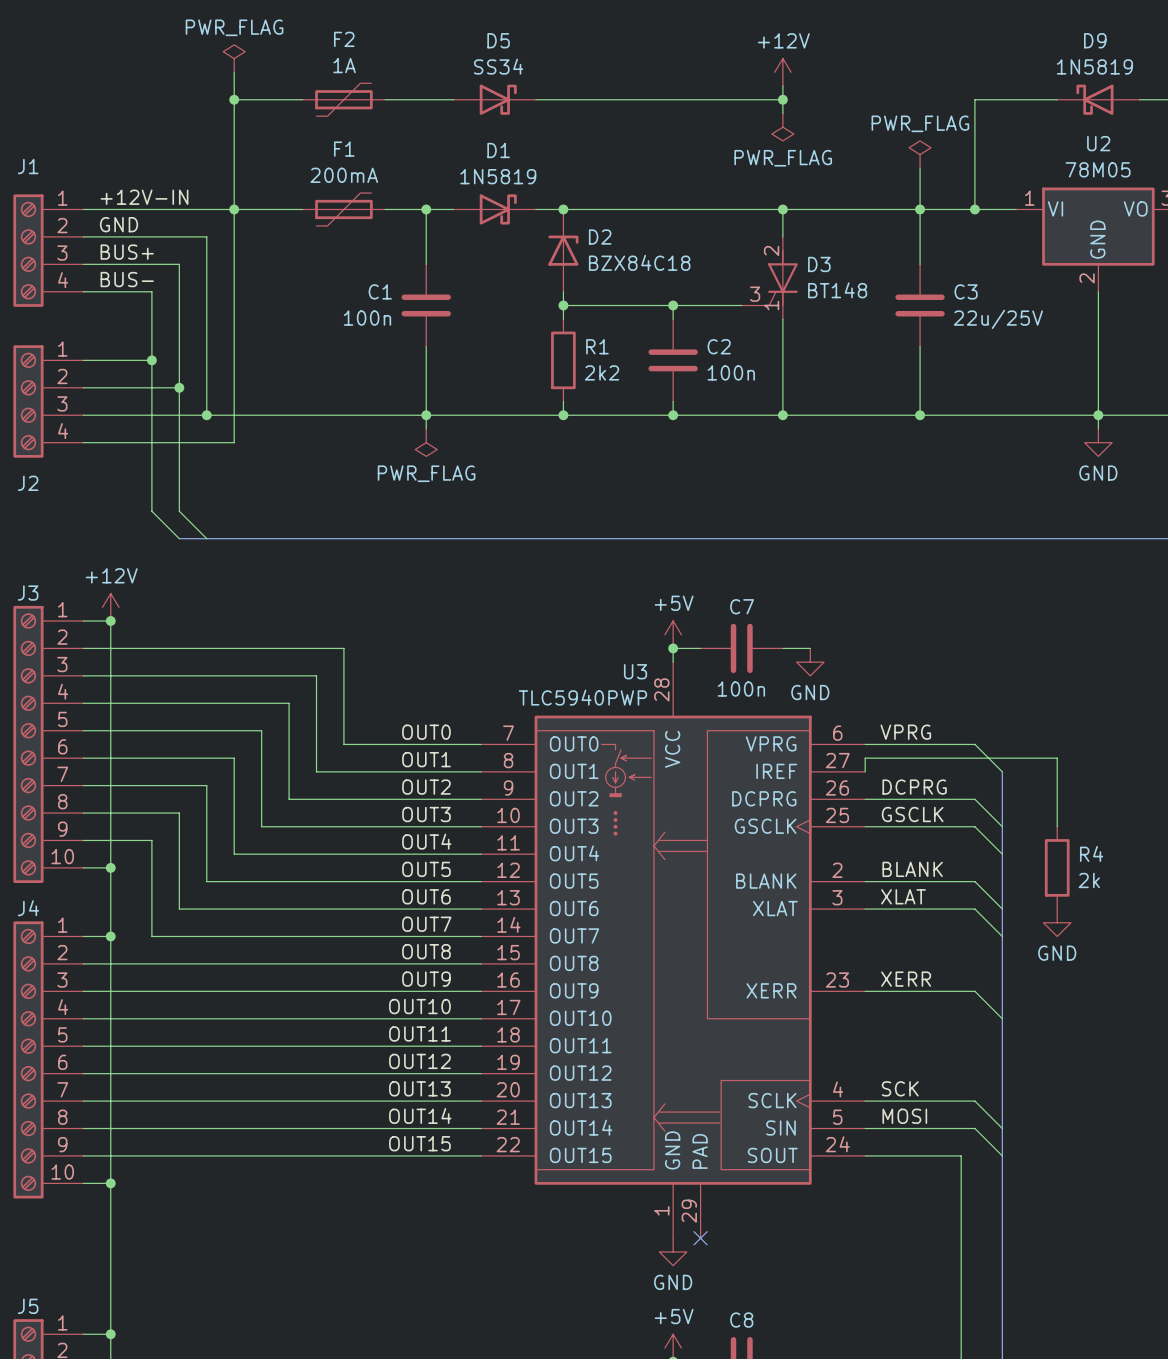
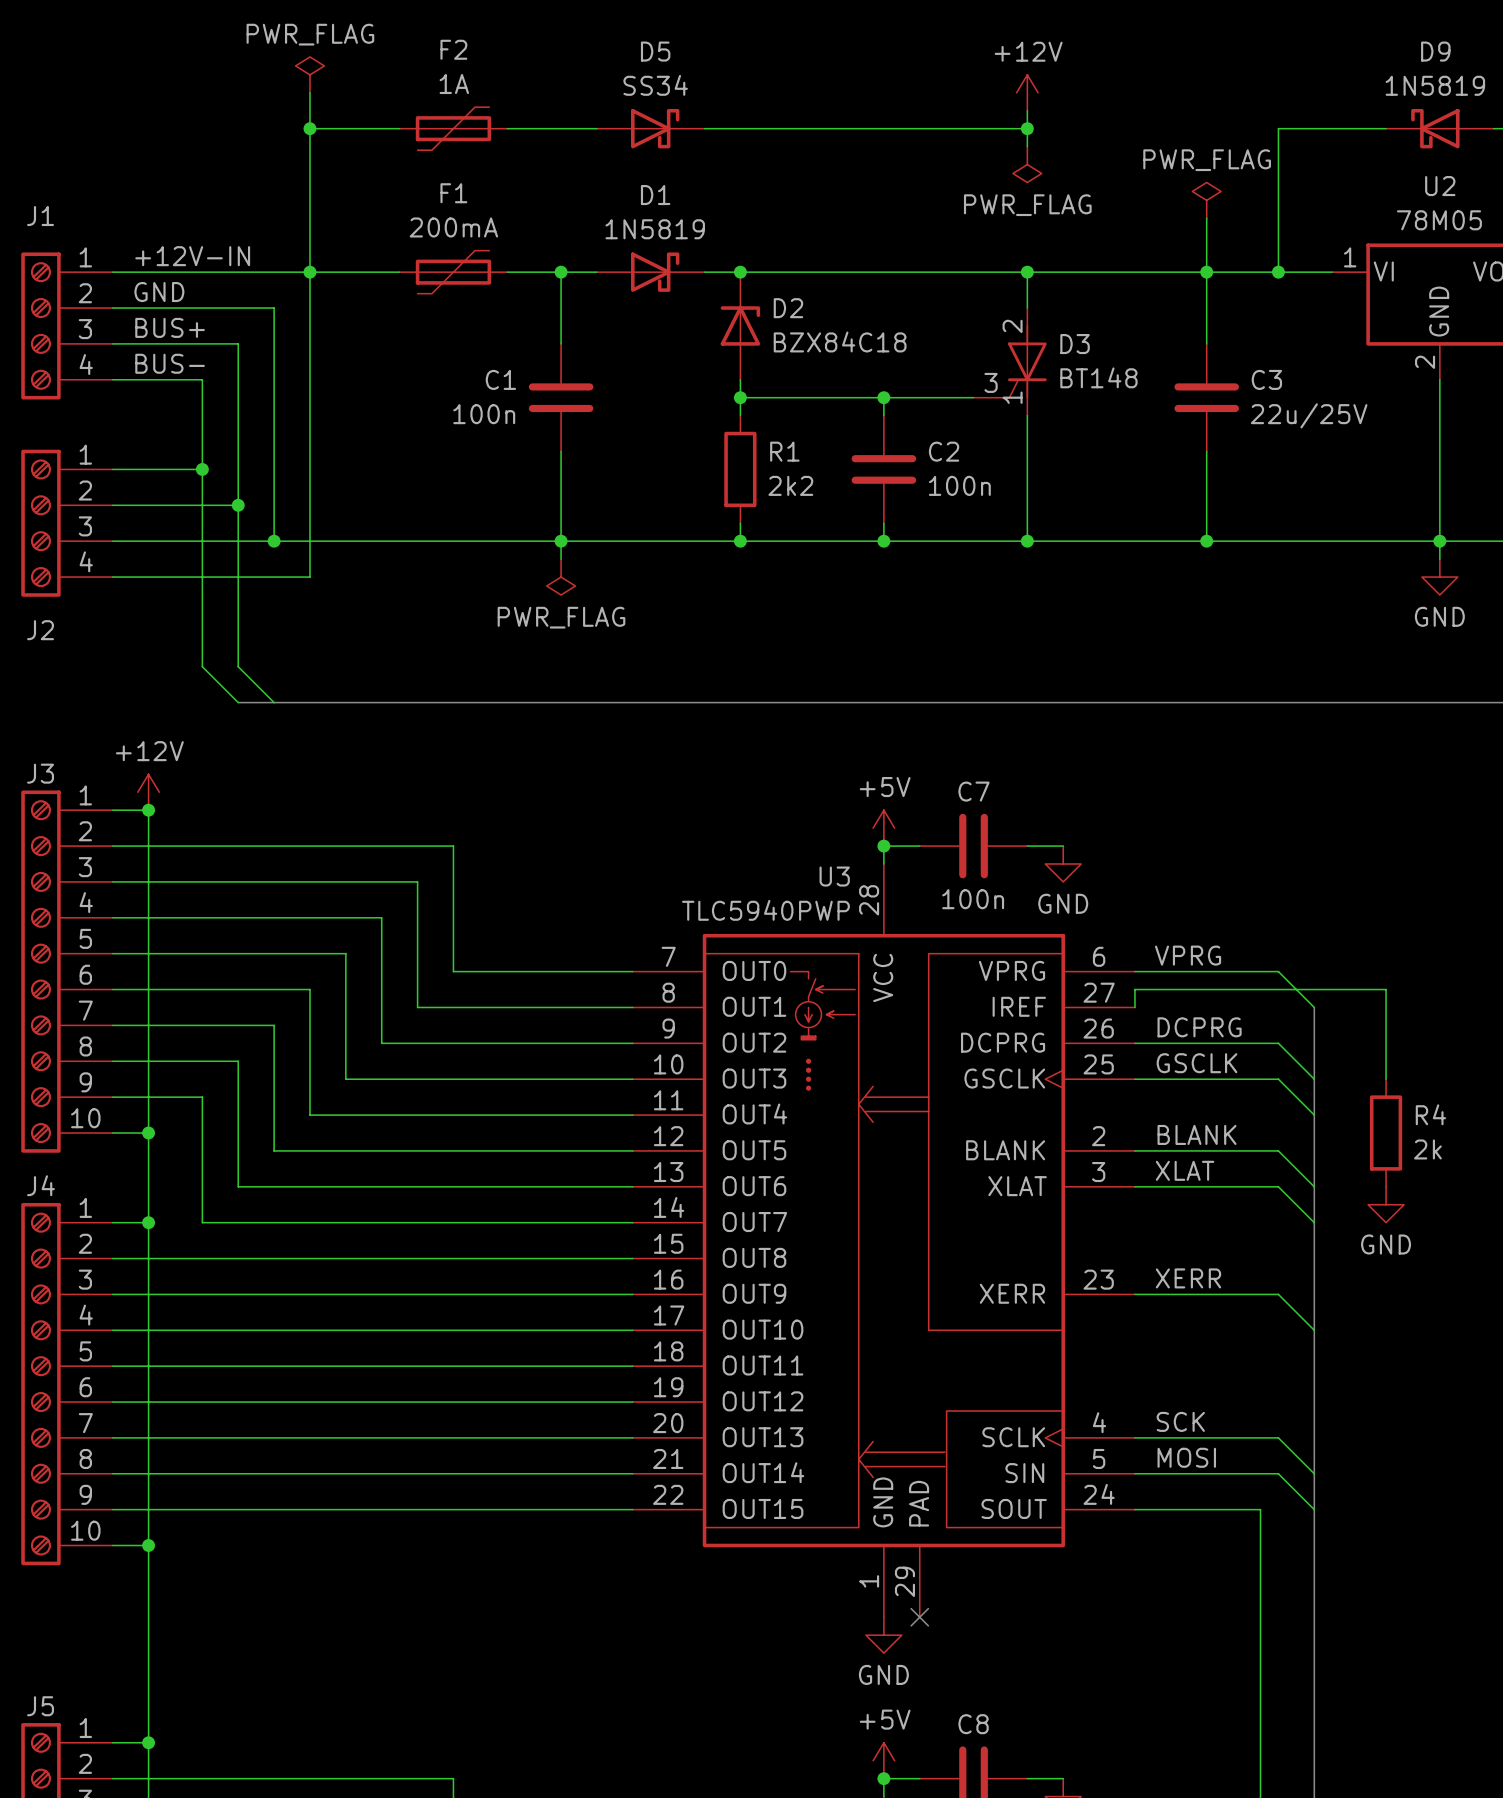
label: OUT0 (426, 732) -> none
label: OUT1 (426, 759) -> none
label: OUT2 (426, 787) -> none
label: OUT3 (426, 814) -> none
label: OUT4 (426, 841) -> none
label: OUT5 (426, 869) -> none
label: OUT6 (426, 896) -> none
label: OUT7 (426, 924) -> none
label: OUT8 (426, 951) -> none
label: OUT9 (426, 979) -> none
label: OUT10 (419, 1006) -> none
label: OUT11 (419, 1033) -> none
label: OUT12 (419, 1061) -> none
label: OUT13 (419, 1088) -> none
label: OUT14 (420, 1115) -> none
label: OUT15 (419, 1143) -> none

